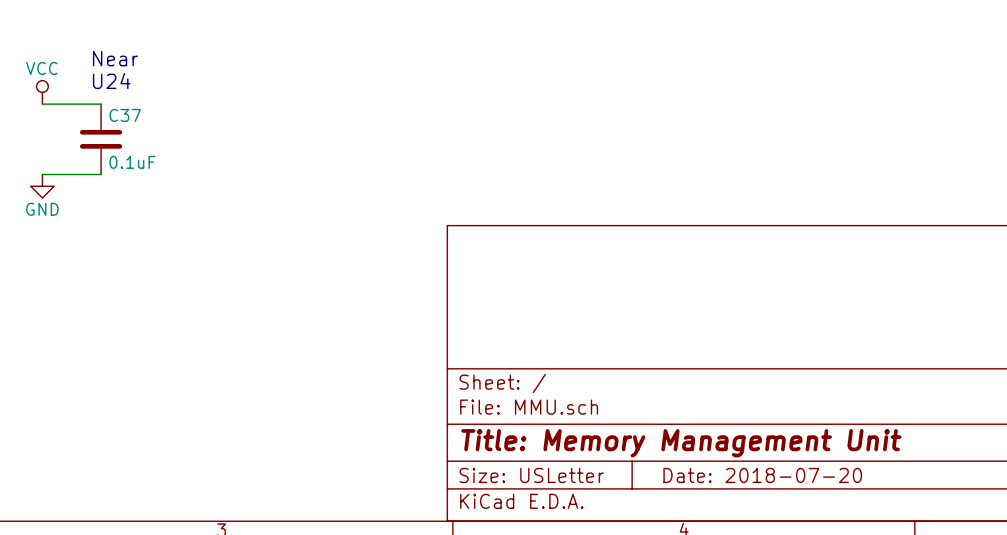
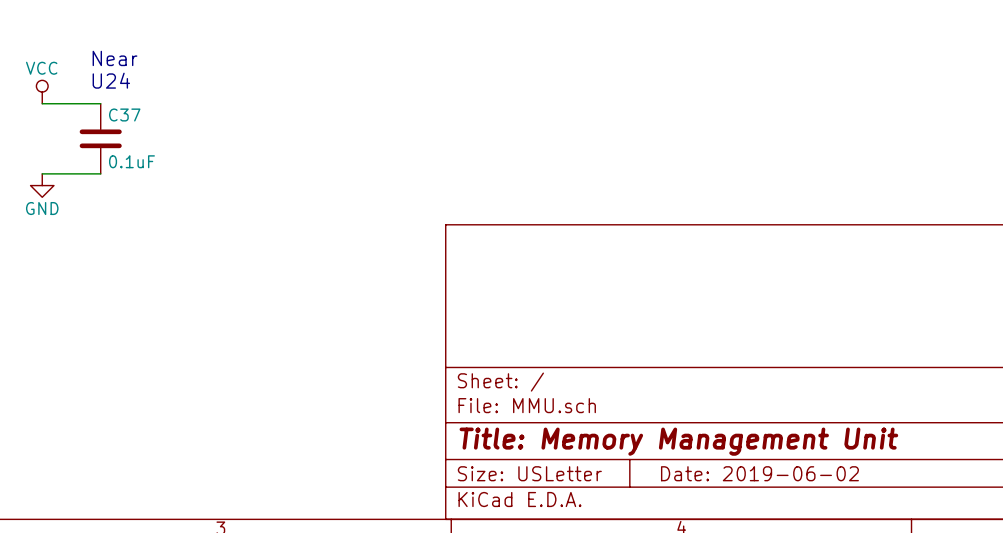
title block: Date: 2018-07-20 (762, 475) -> Date: 2019-06-02 (759, 473)

